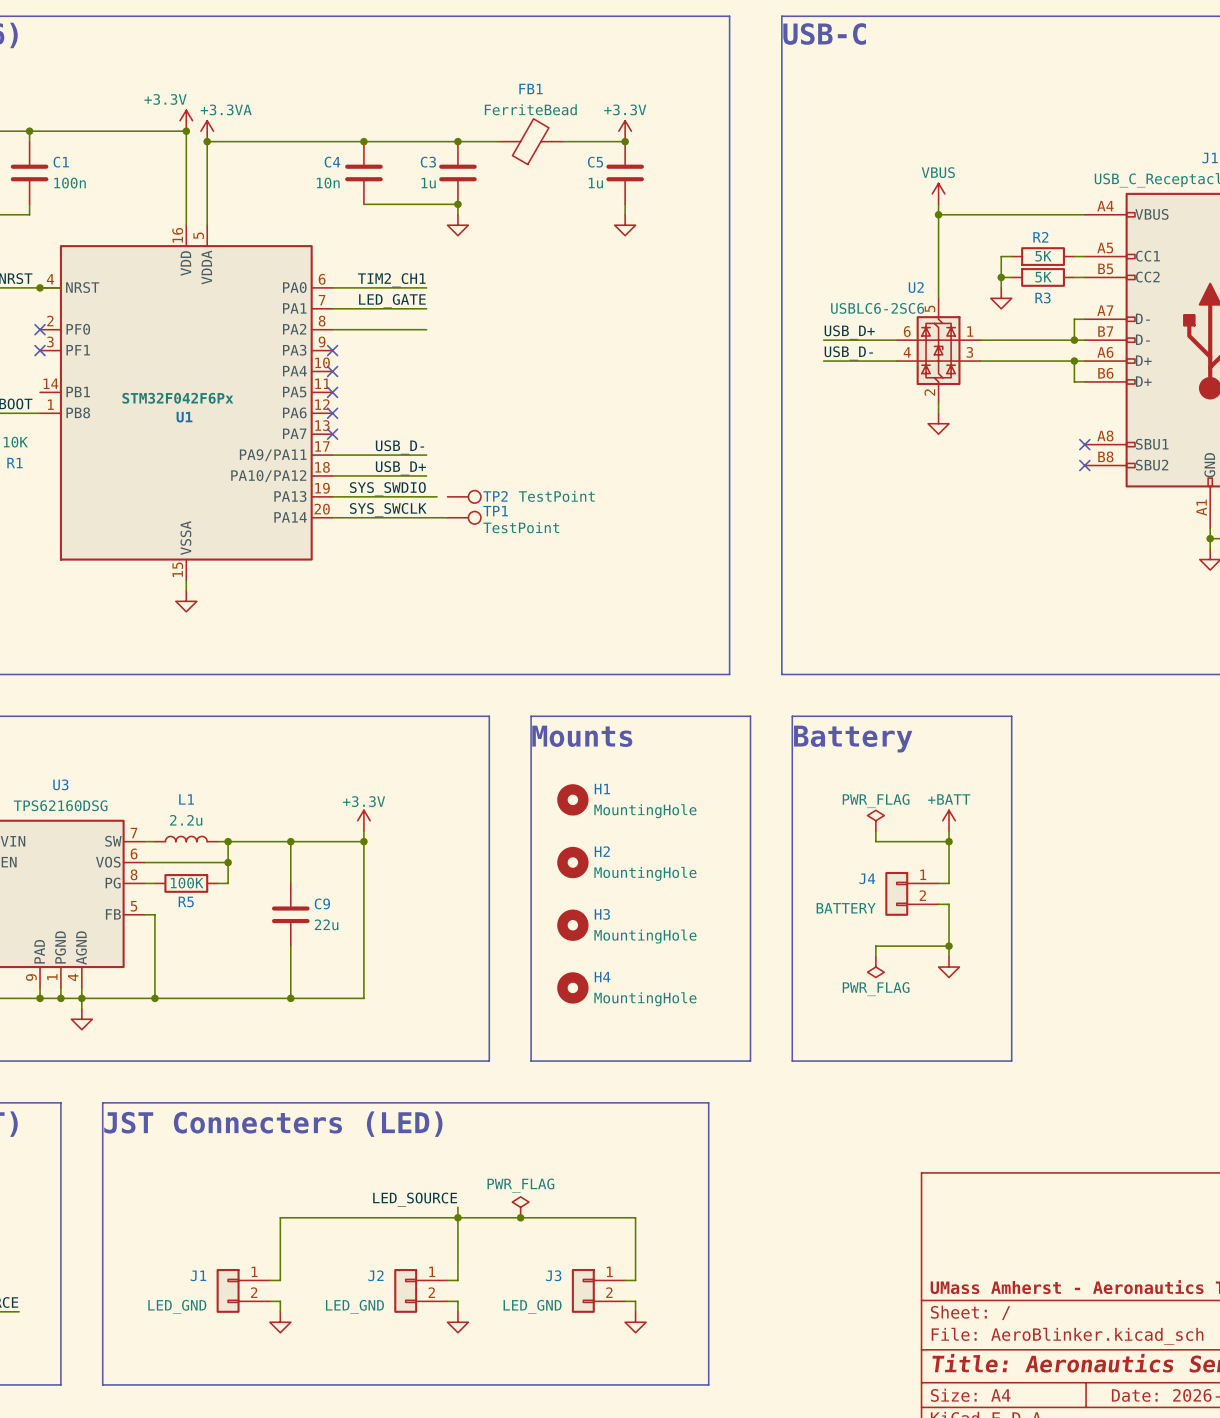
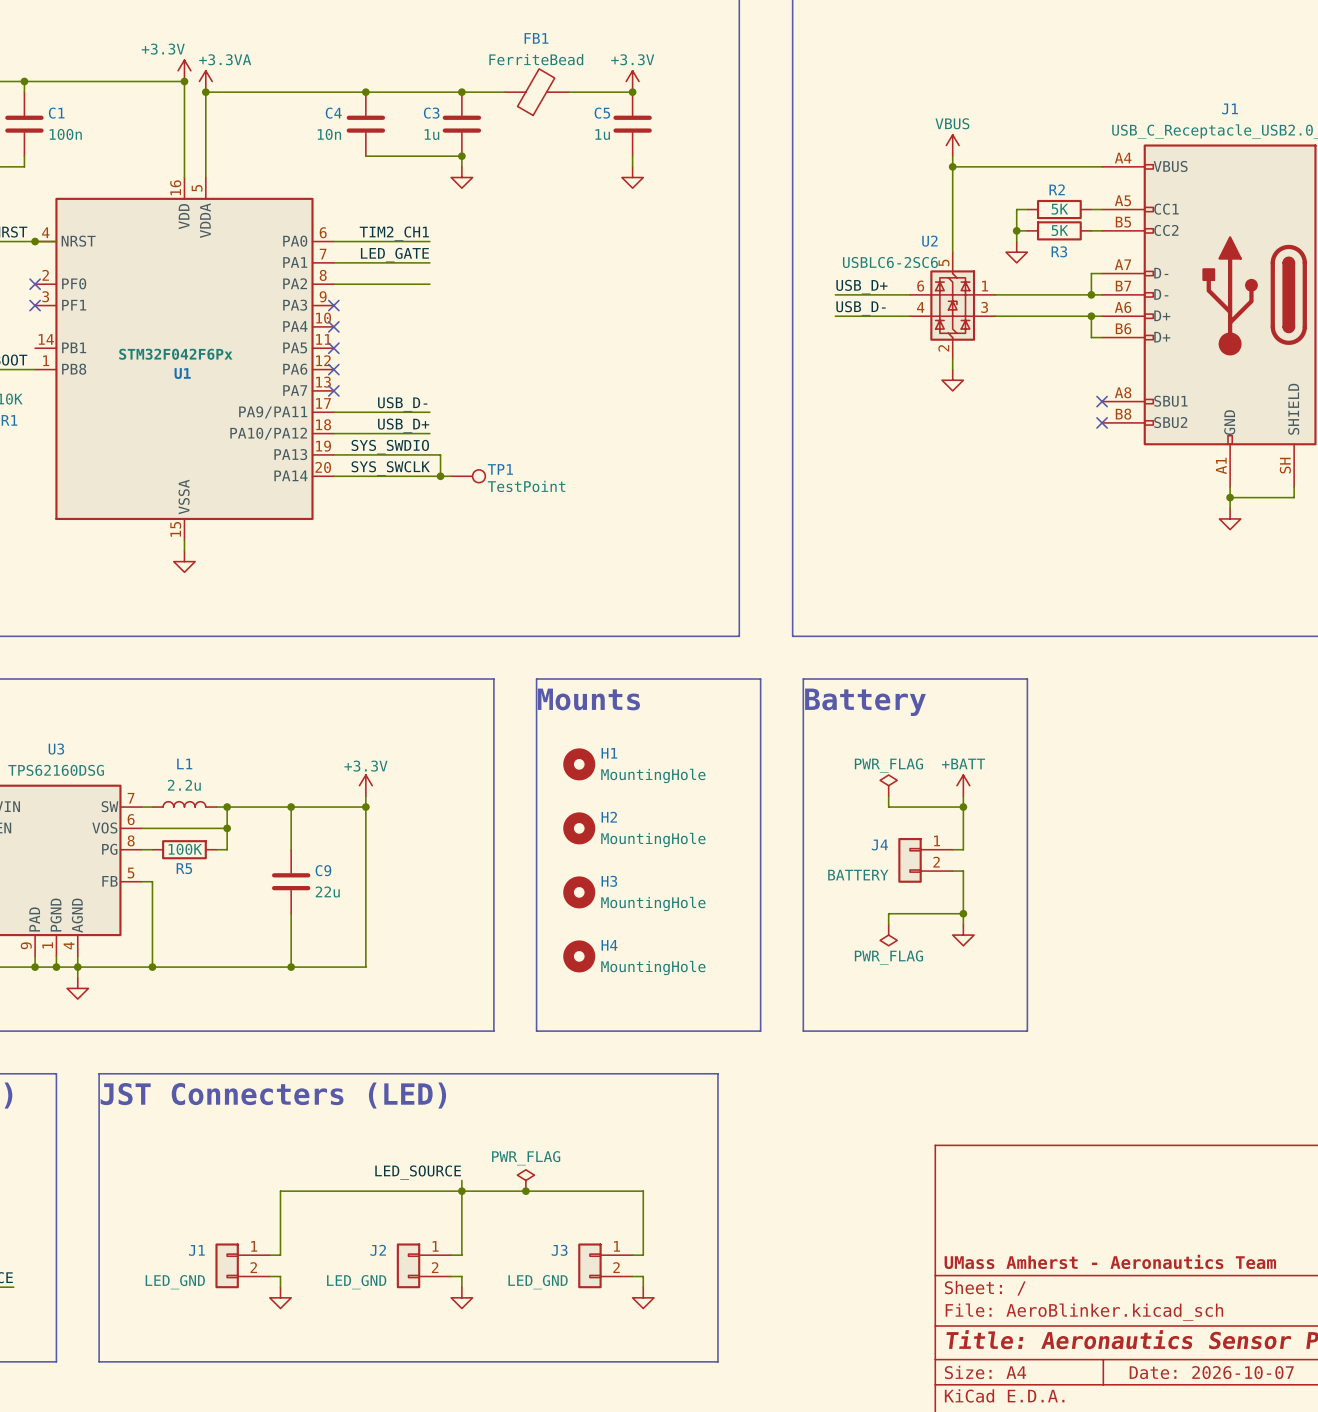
wire: none -> (440, 454) (440, 476)
TP2: TestPoint (464, 496) -> none
junction: none -> (440, 476)

